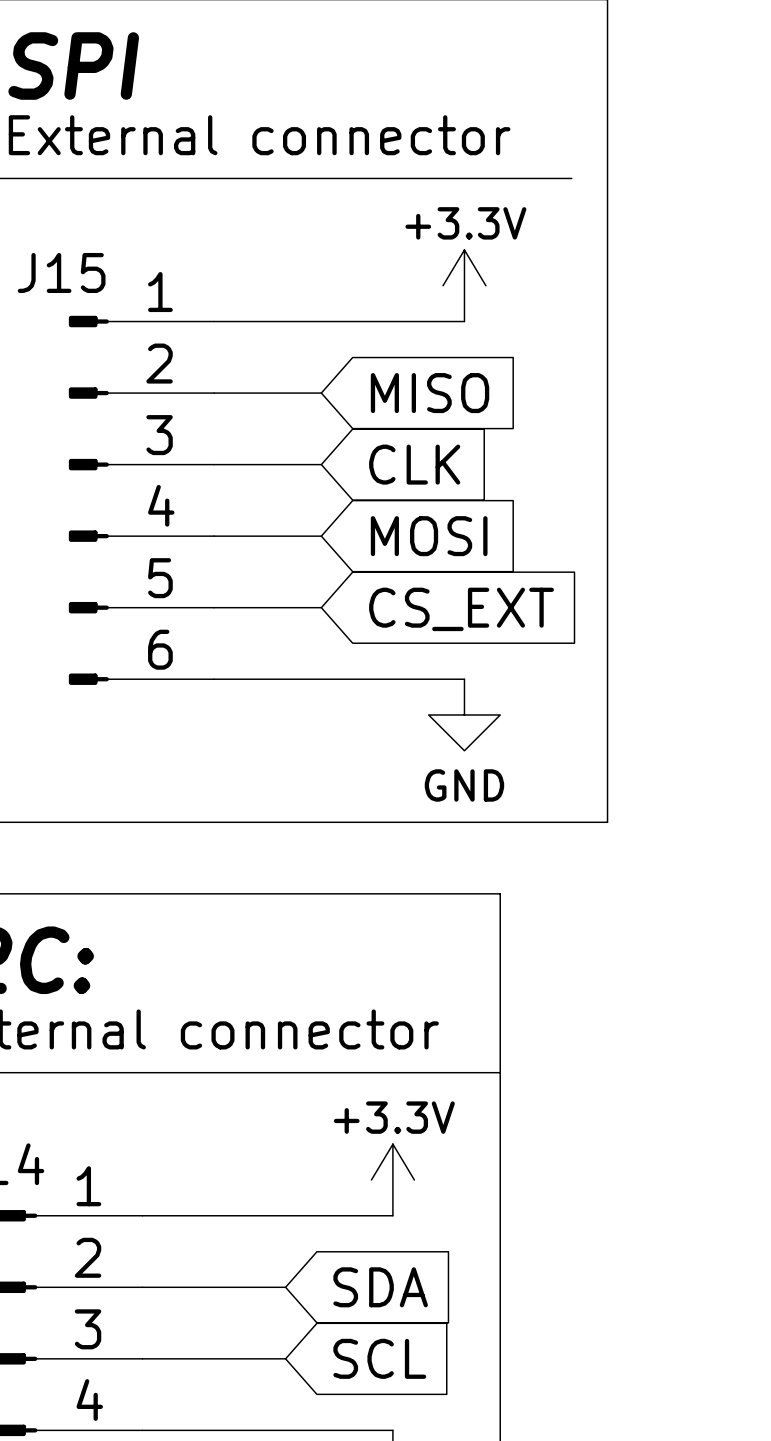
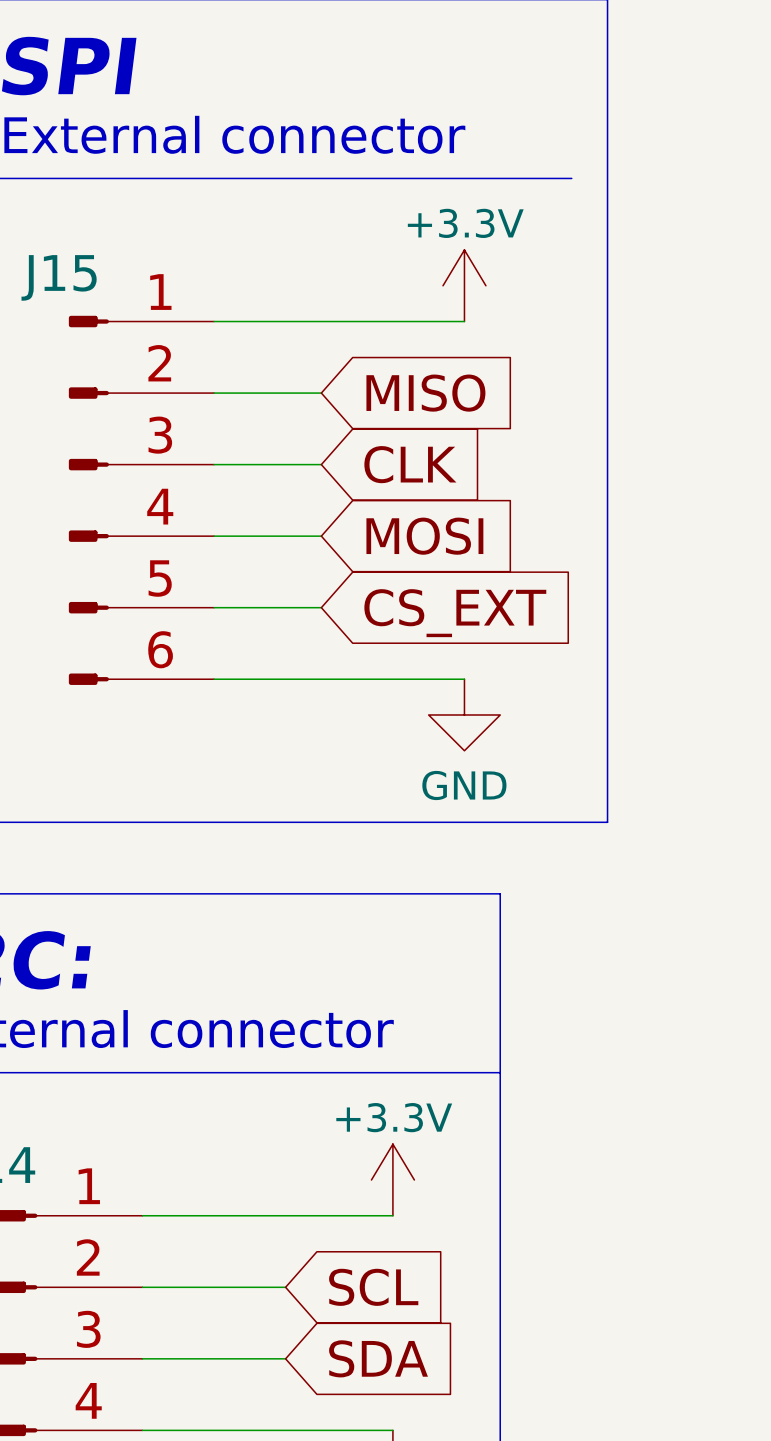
global label: SDA (380, 1287) -> SCL (373, 1287)
global label: SCL (379, 1358) -> SDA (378, 1358)

